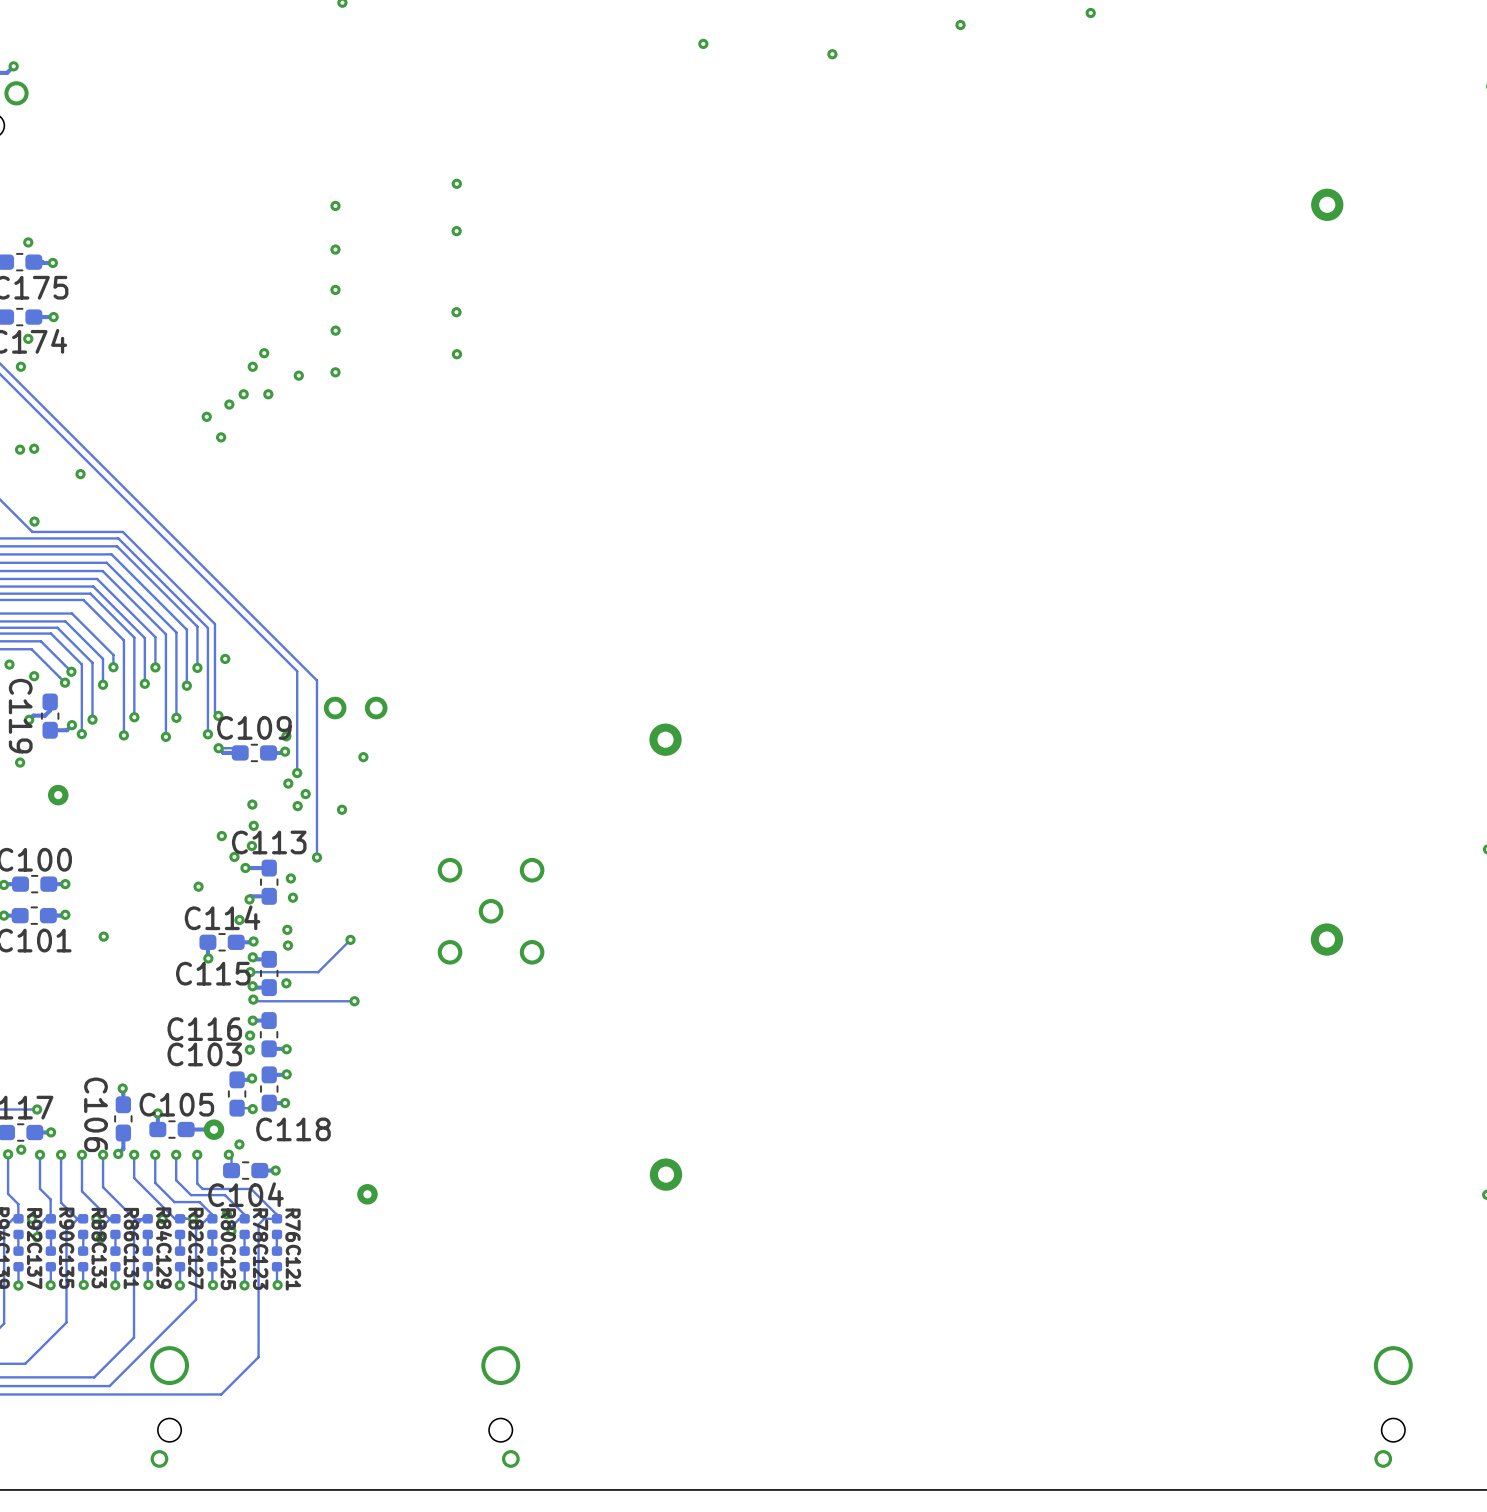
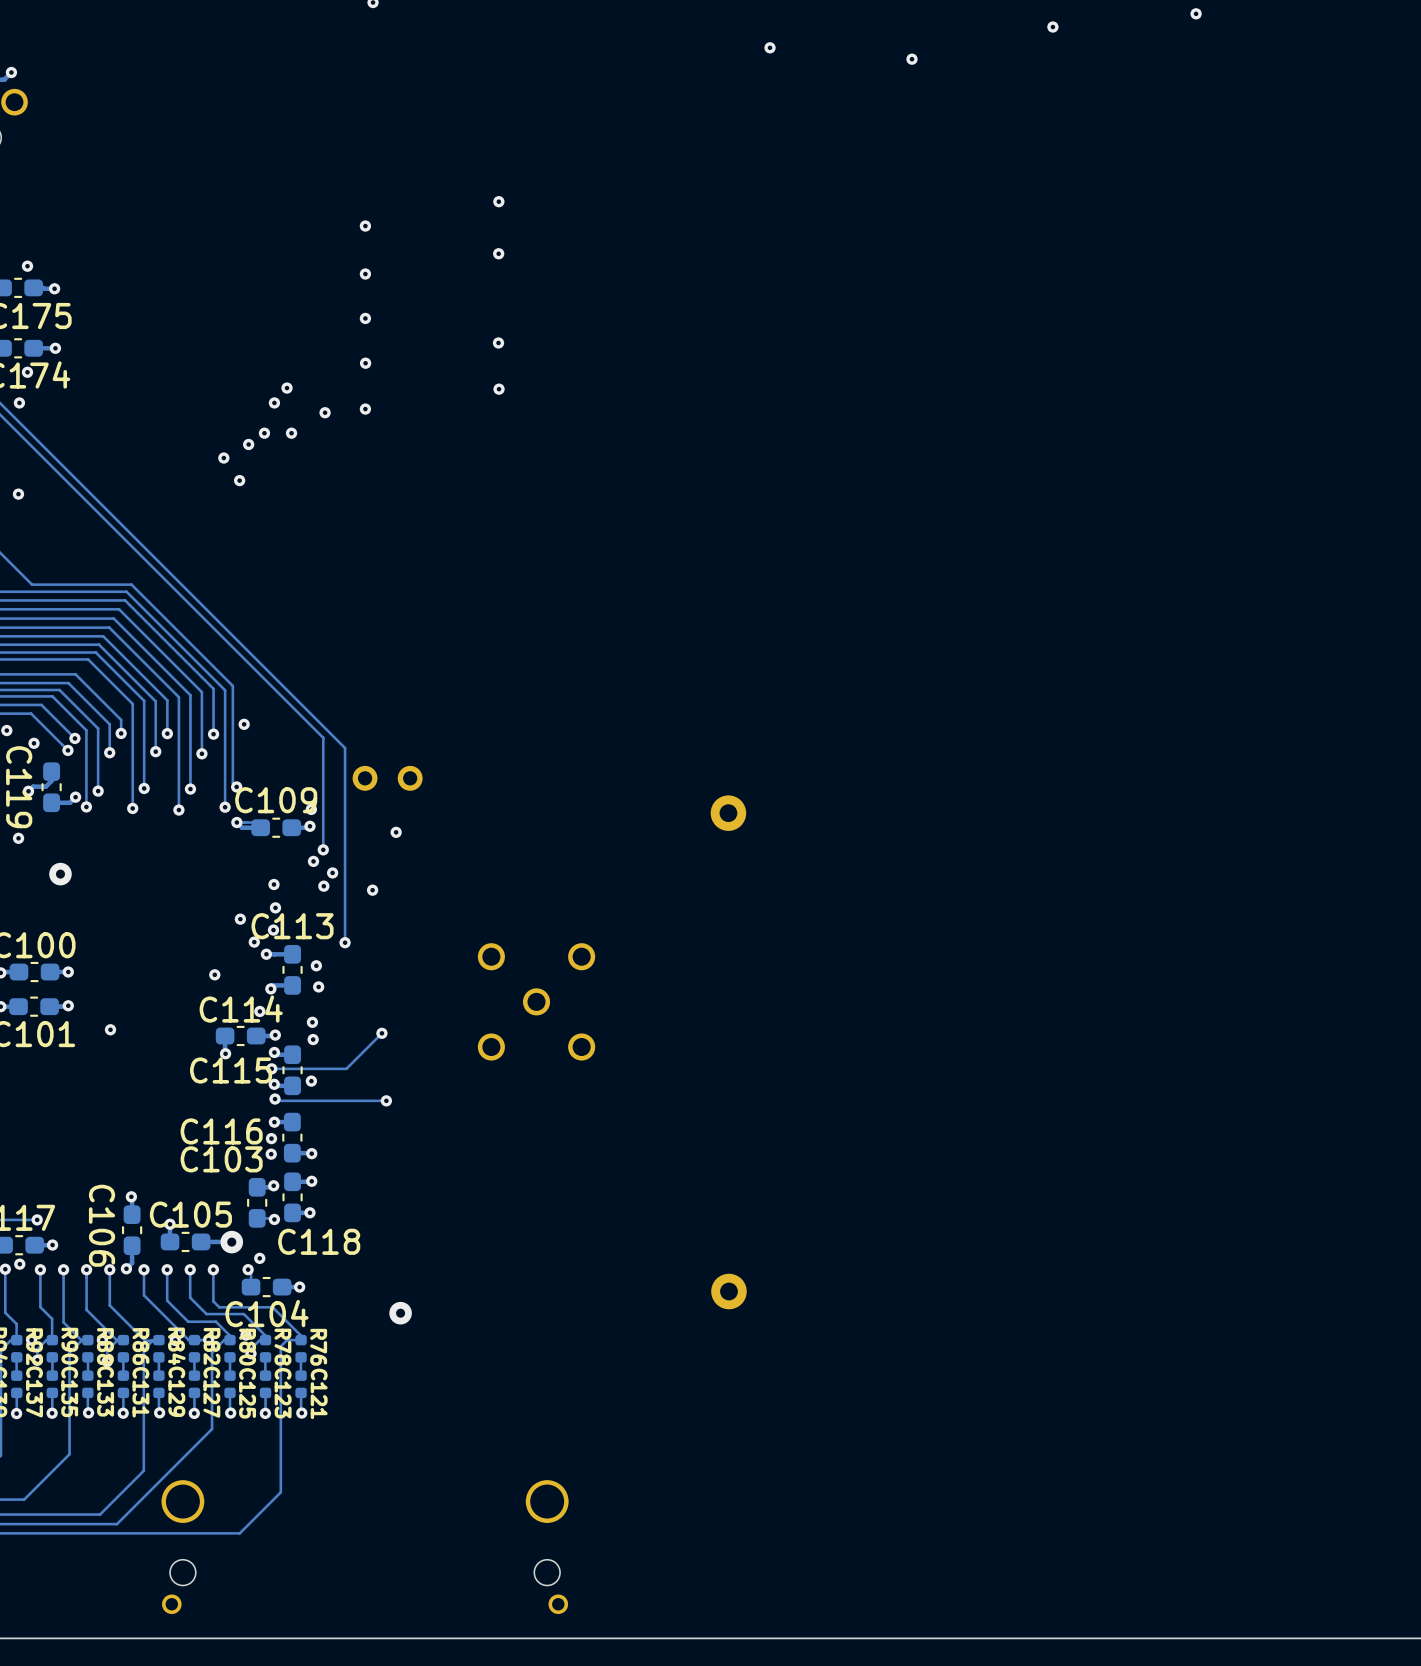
via: (34, 448) -> none
via: (80, 474) -> none
via: (34, 521) -> none

